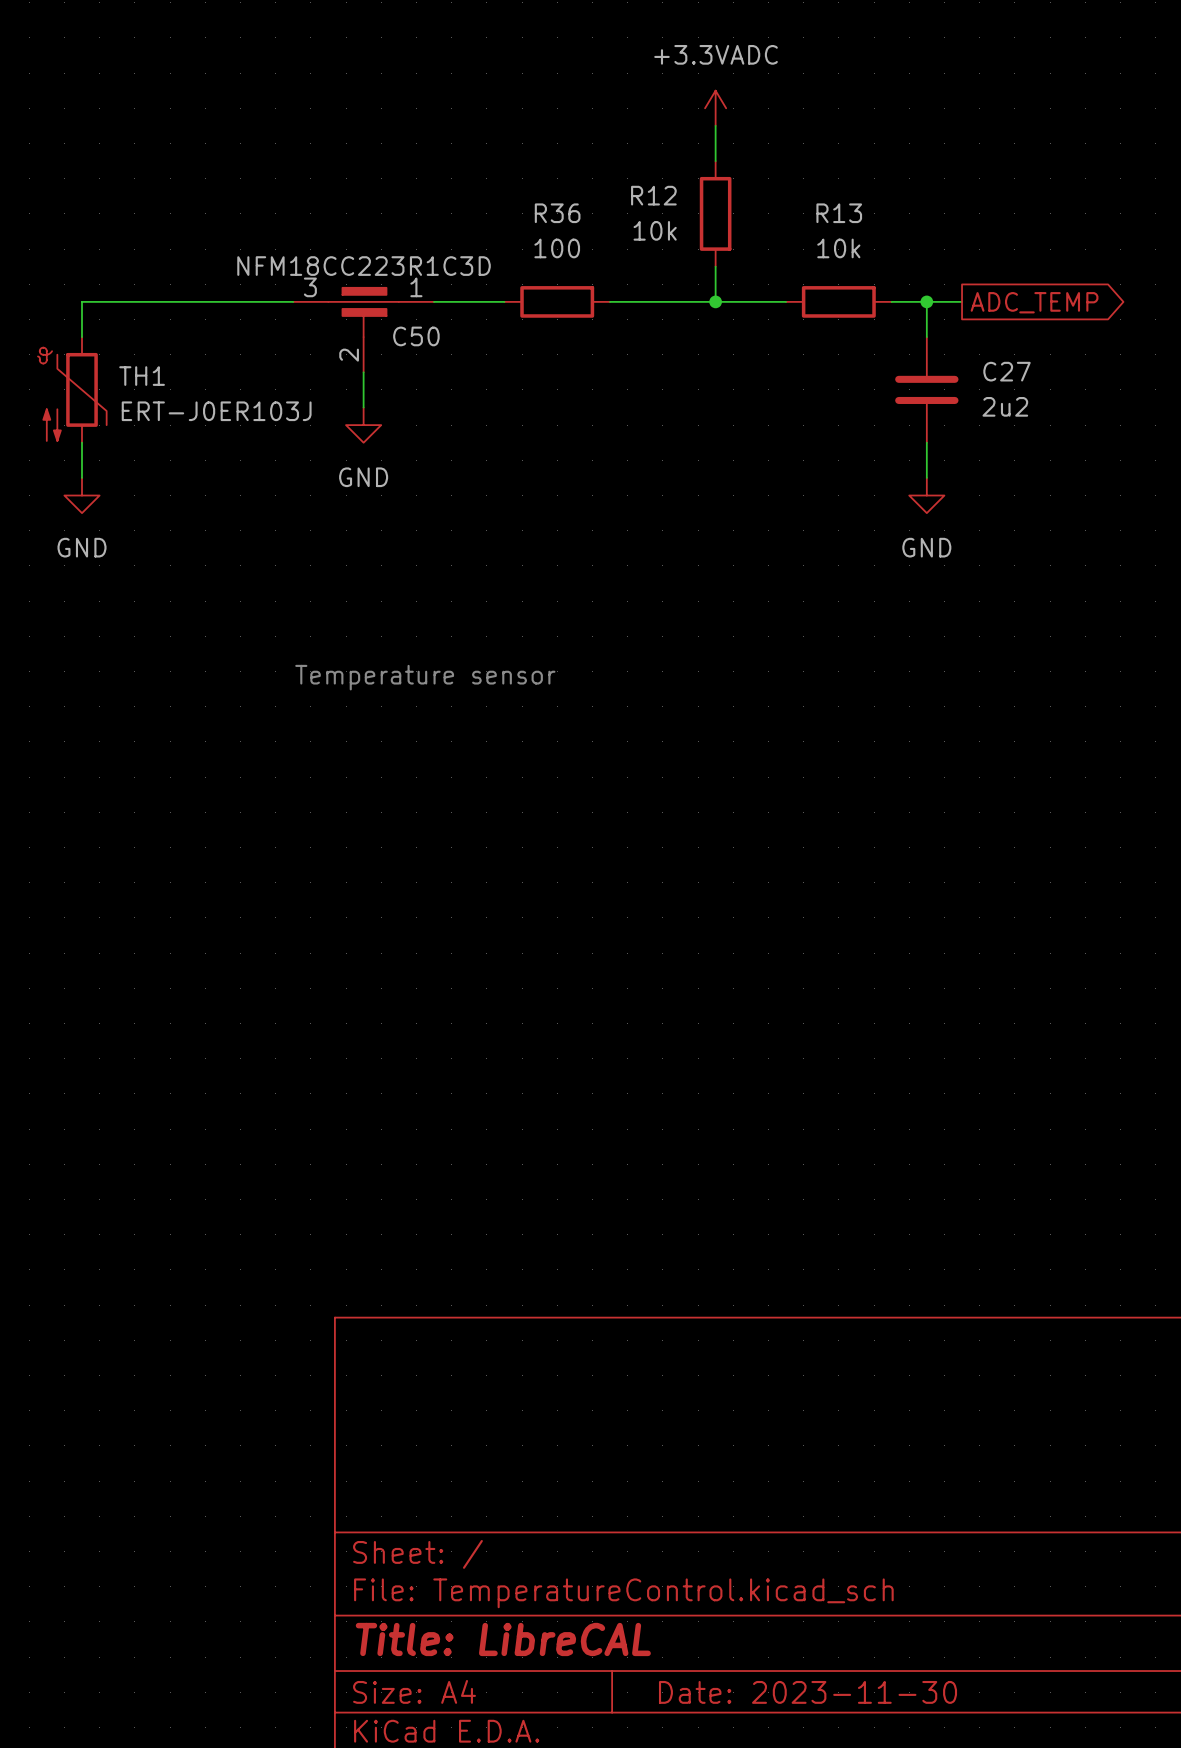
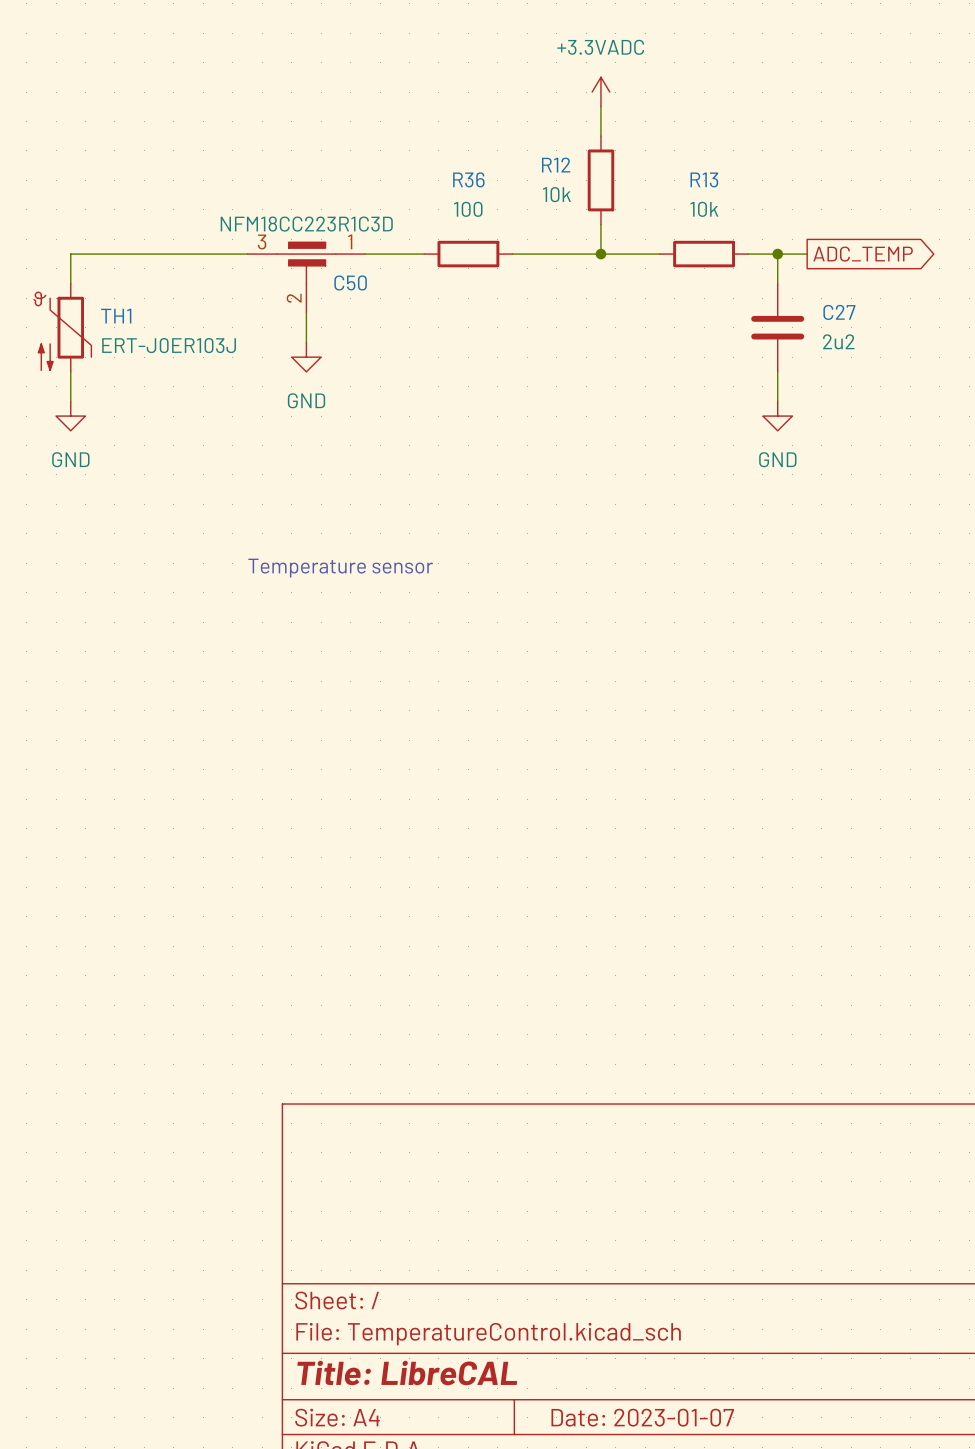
title block: Date: 2023-11-30 (808, 1692) -> Date: 2023-01-07 (642, 1417)

